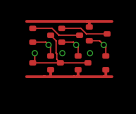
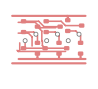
top track: none -> (18, 15) (12, 15)
top track: none -> (18, 22) (35, 22) (40, 27) (55, 27)
top track: none -> (18, 33) (28, 33) (32, 36) (32, 46)
top track: none -> (19, 42) (18, 51)
top track: none -> (17, 50) (18, 51)
top track: none -> (65, 51) (18, 51)
top track: none -> (85, 63) (12, 63)

